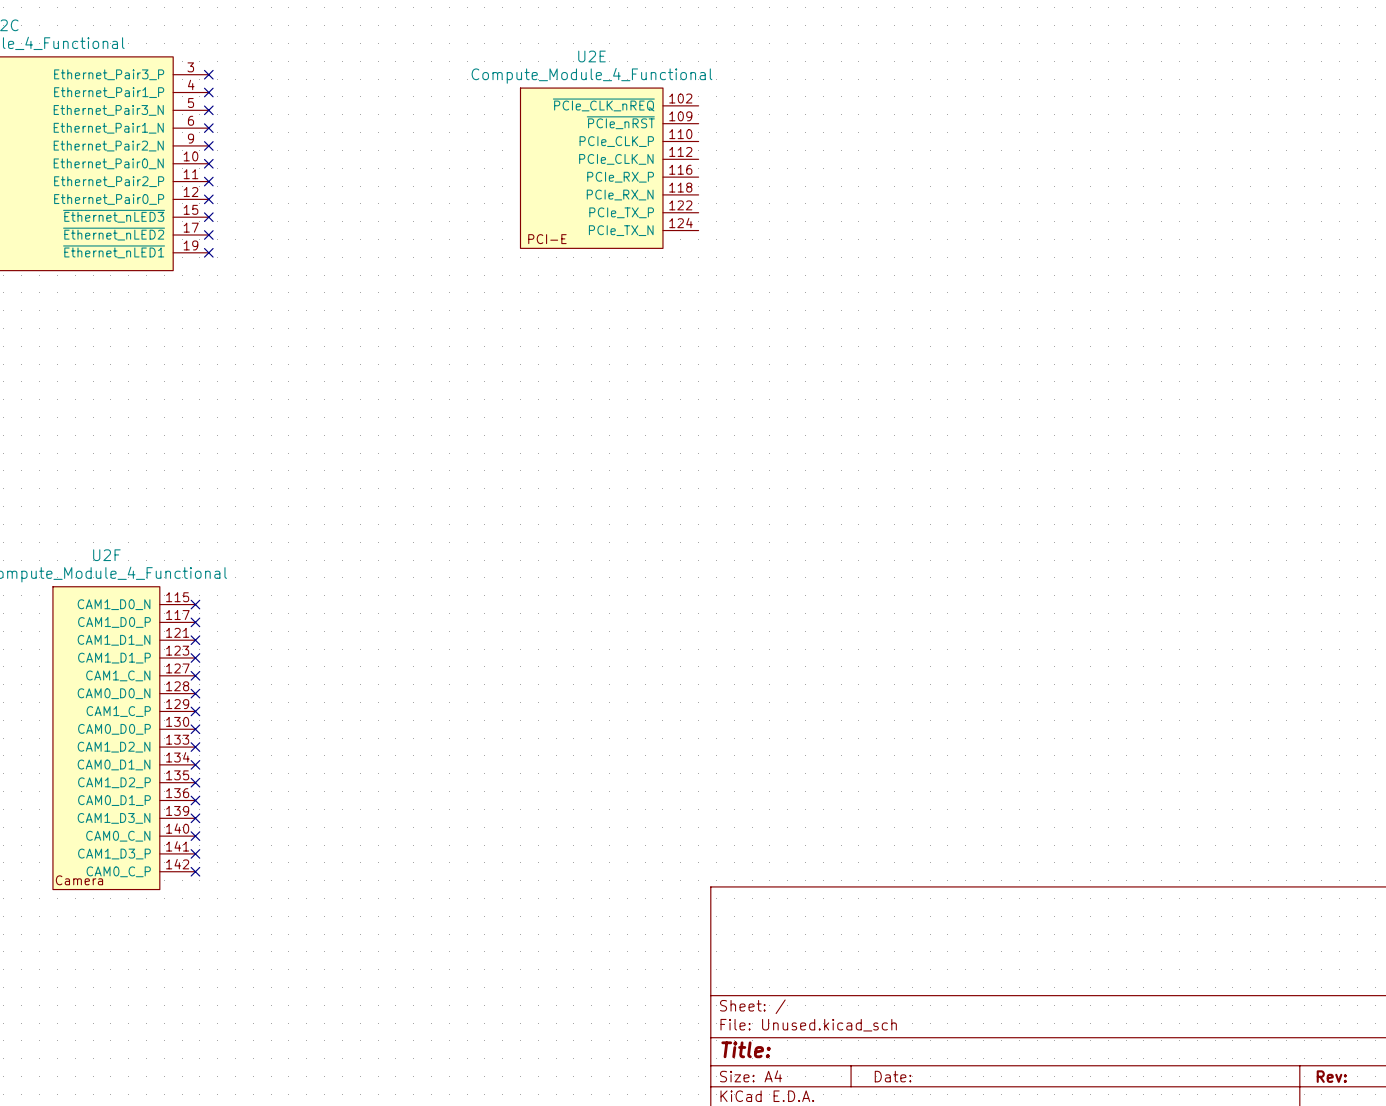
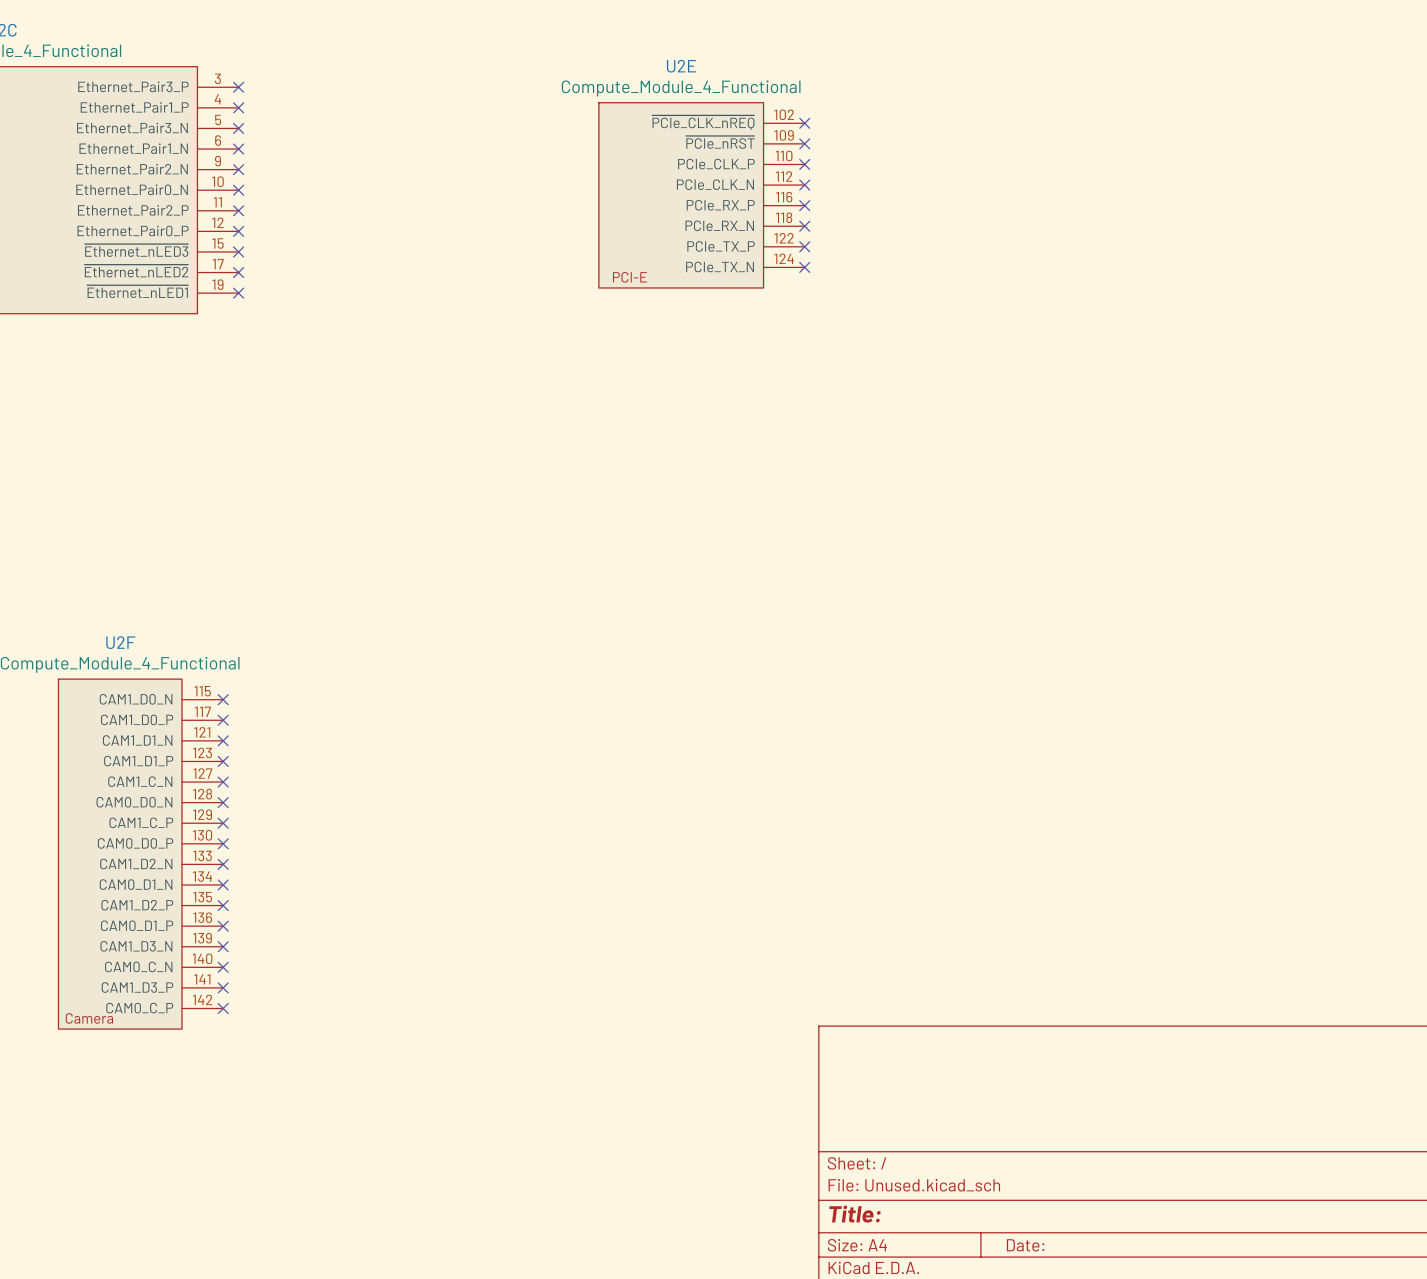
no-connect mark: none -> (804, 123)
no-connect mark: none -> (804, 143)
no-connect mark: none -> (804, 164)
no-connect mark: none -> (804, 185)
no-connect mark: none -> (804, 205)
no-connect mark: none -> (804, 226)
no-connect mark: none -> (804, 246)
no-connect mark: none -> (804, 267)

